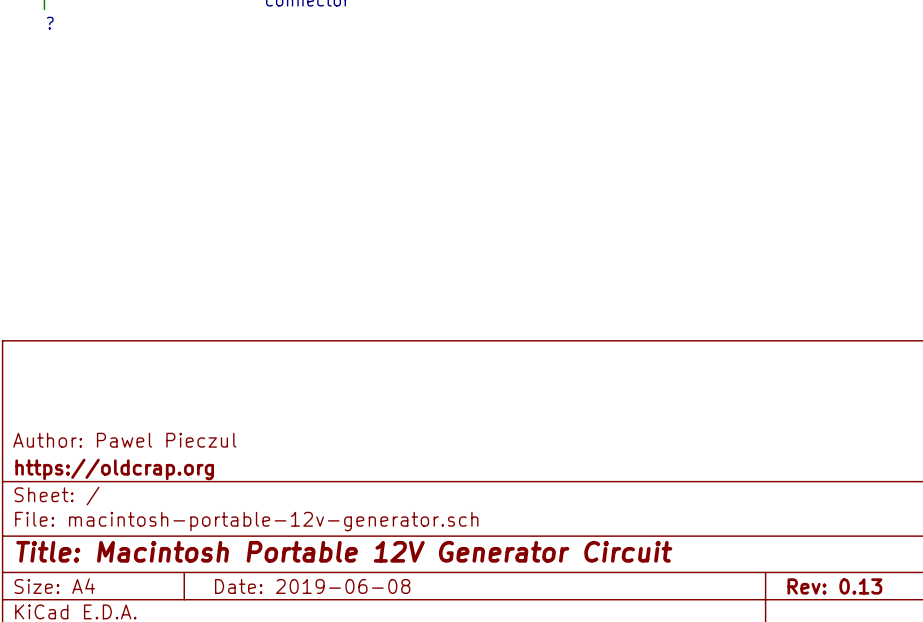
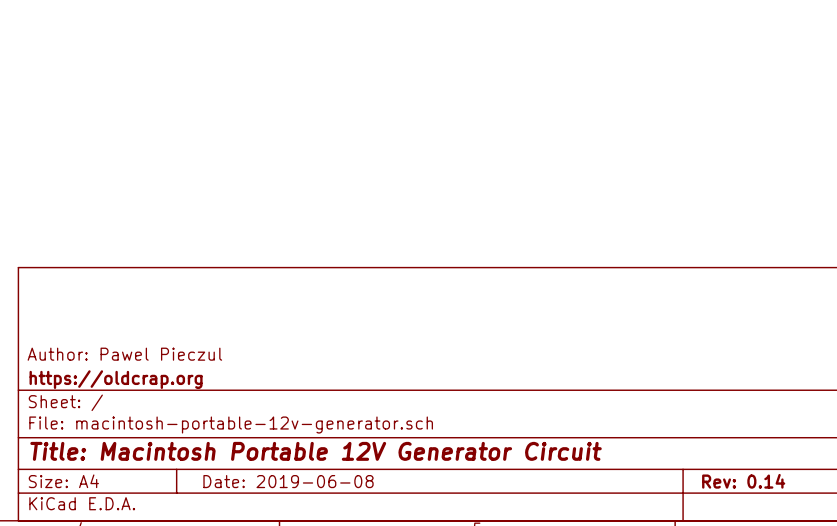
title block: Rev: 0.13 (834, 586) -> Rev: 0.14 (743, 481)

